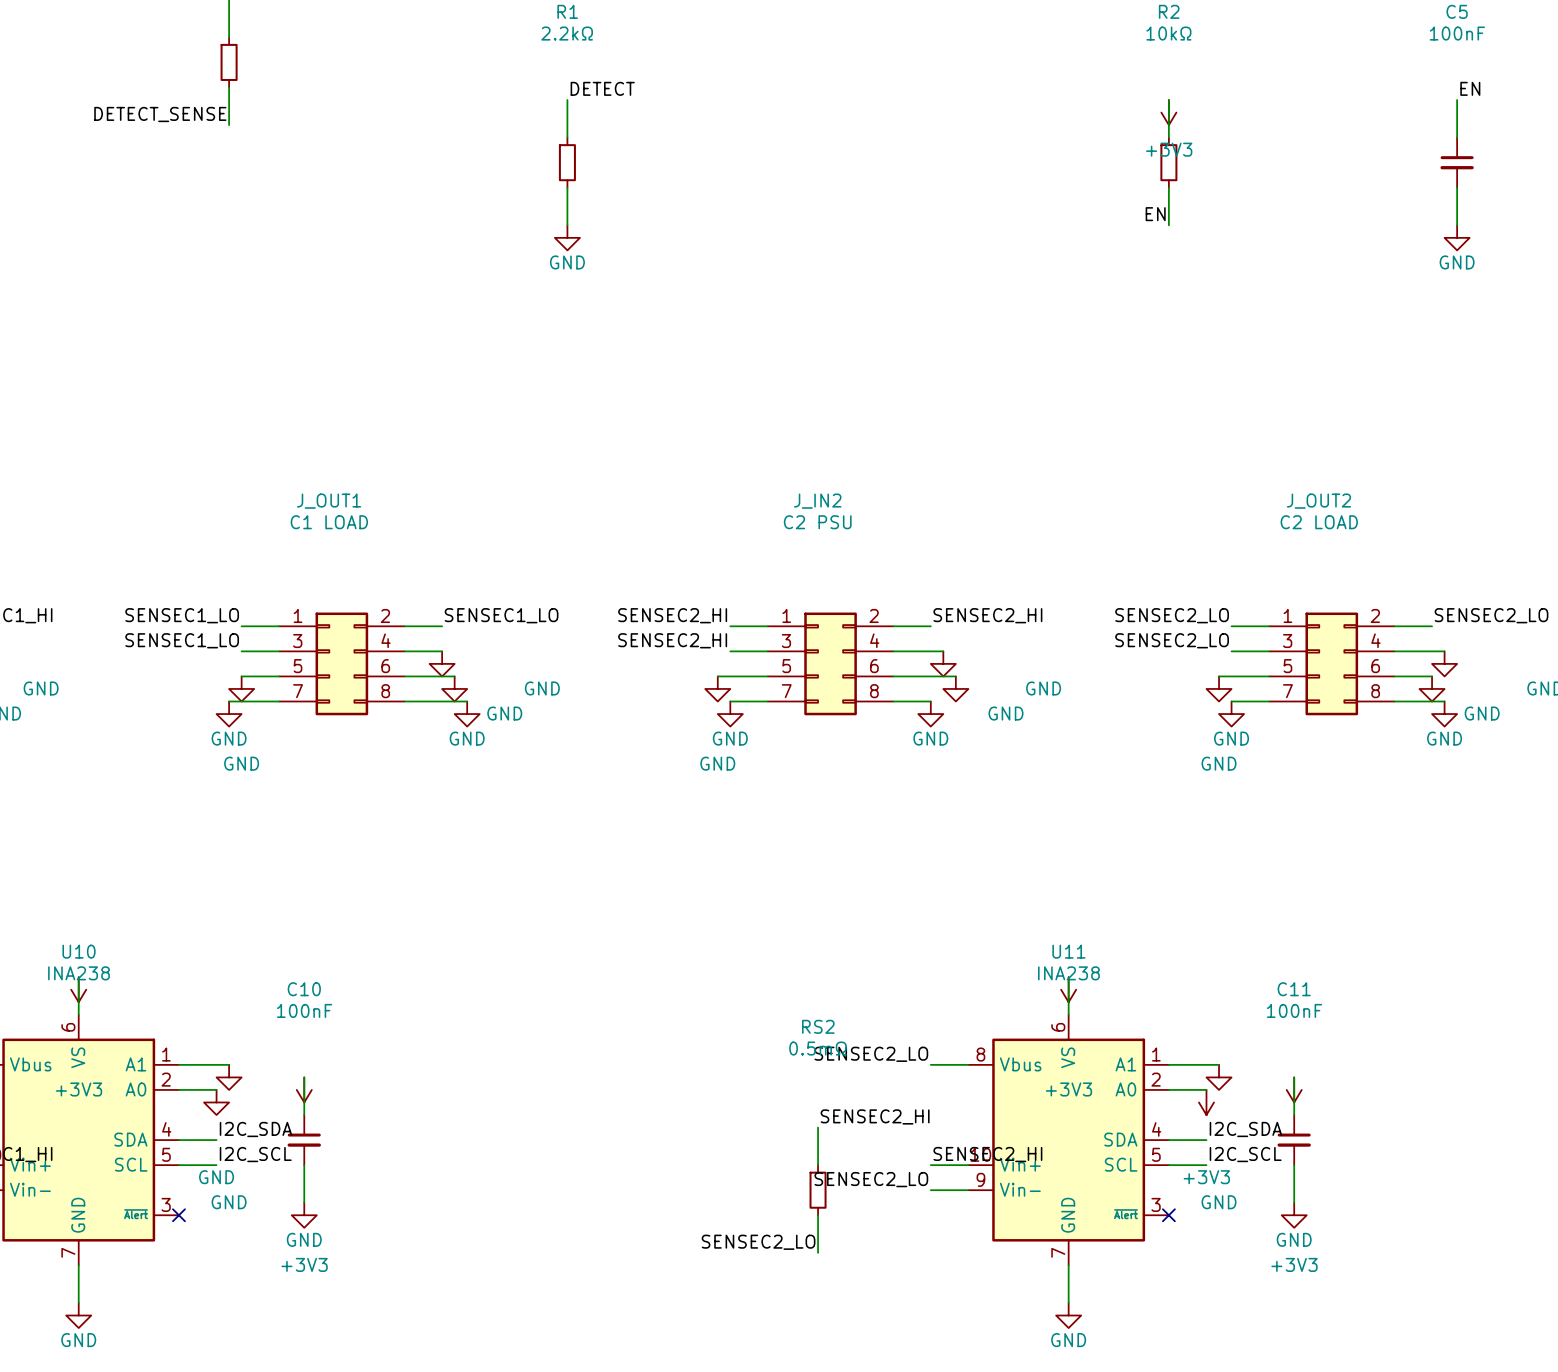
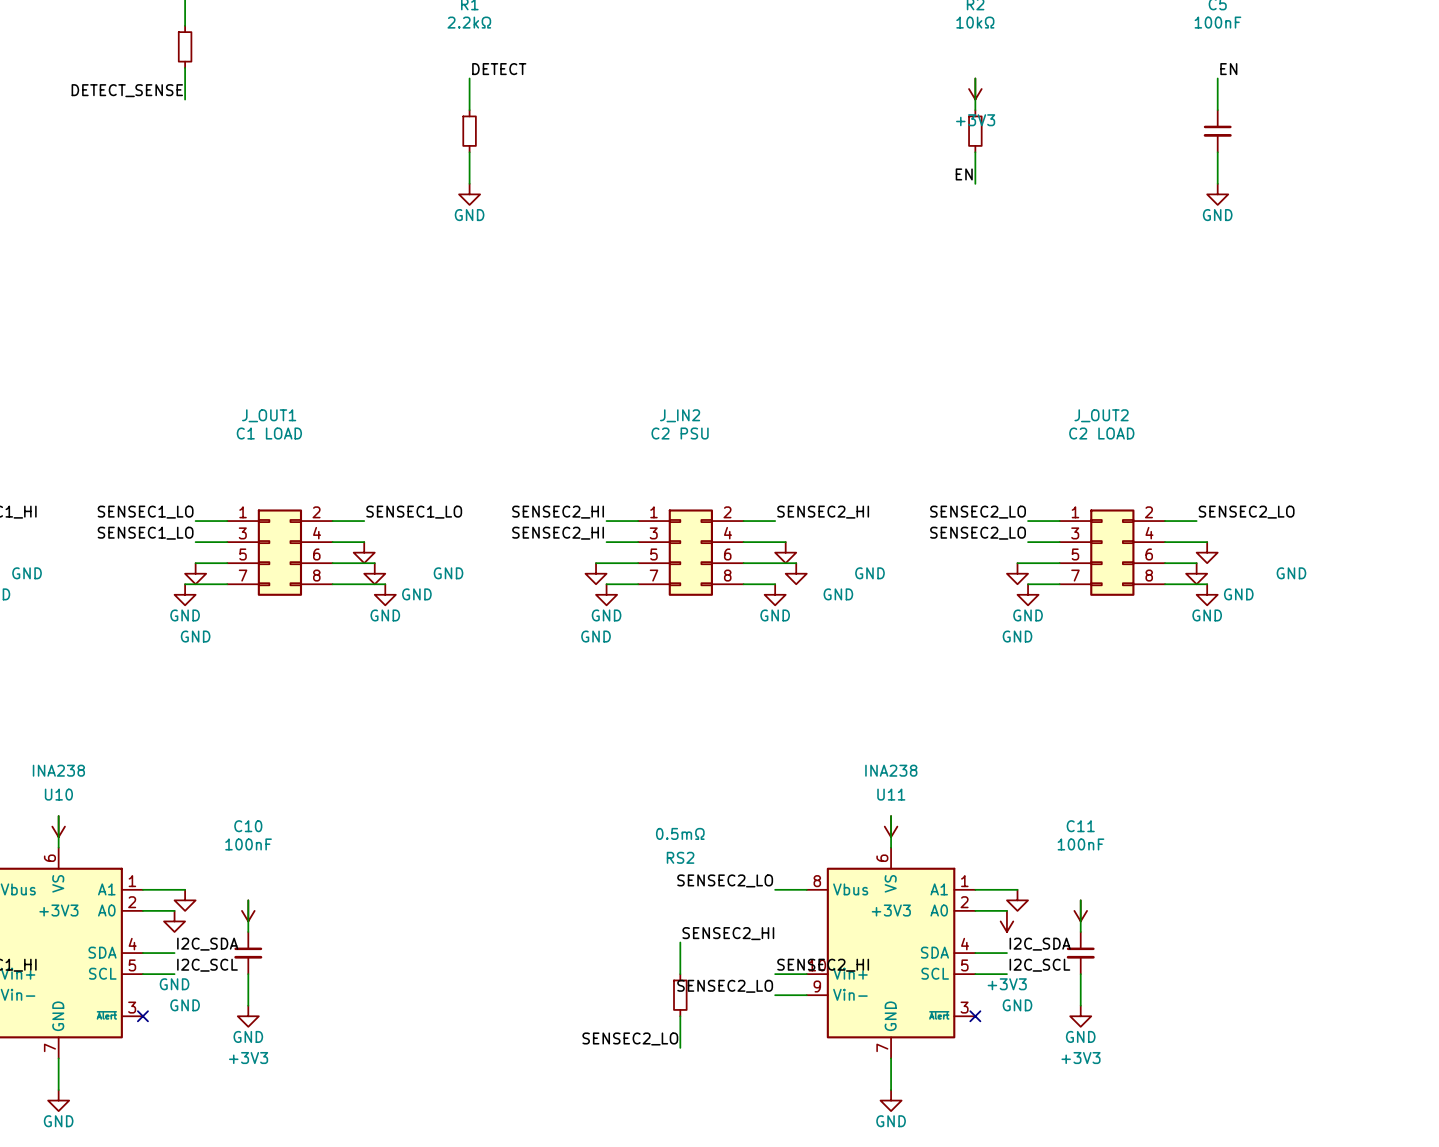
U10 value position: INA238 (79, 973) -> INA238 (58, 770)
U11 value position: INA238 (1068, 973) -> INA238 (891, 770)
RS2 value position: 0.5mΩ (818, 1048) -> 0.5mΩ (680, 833)

